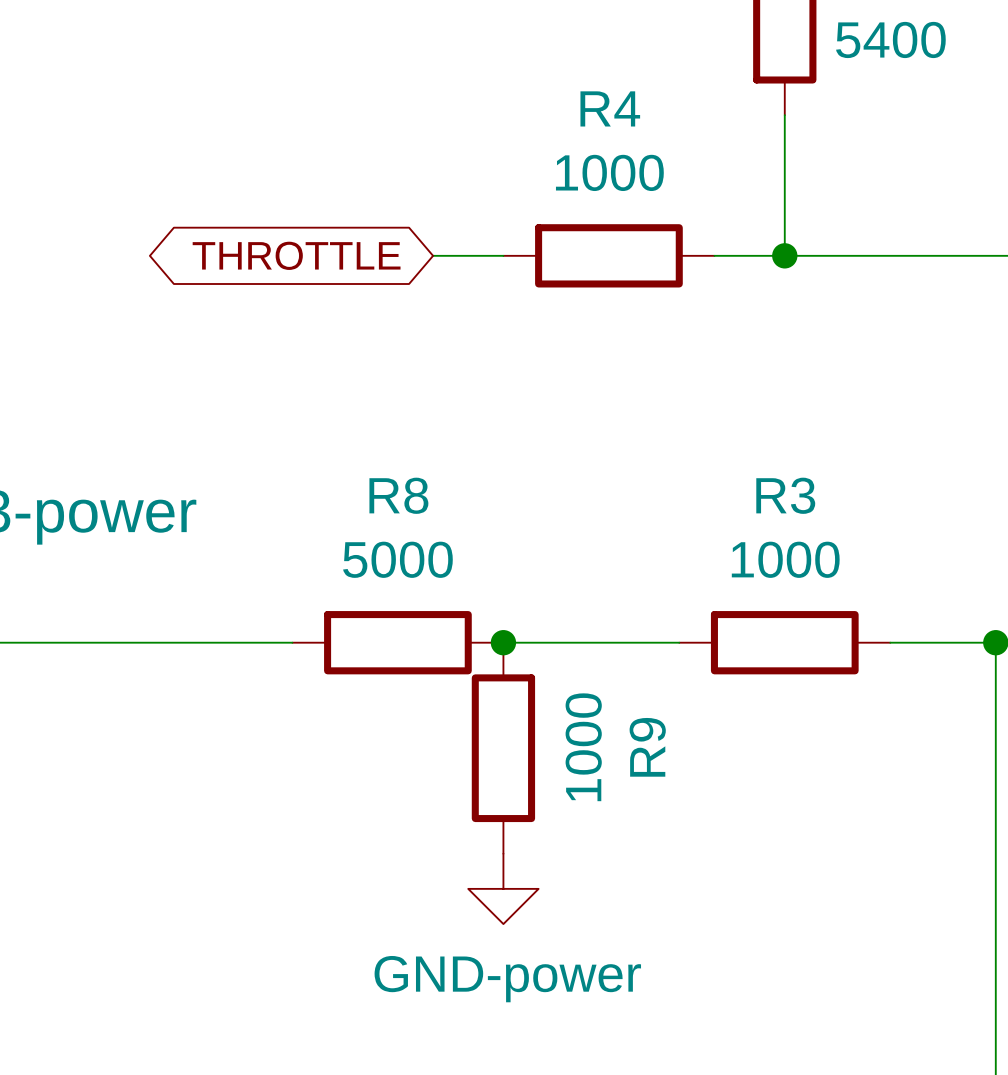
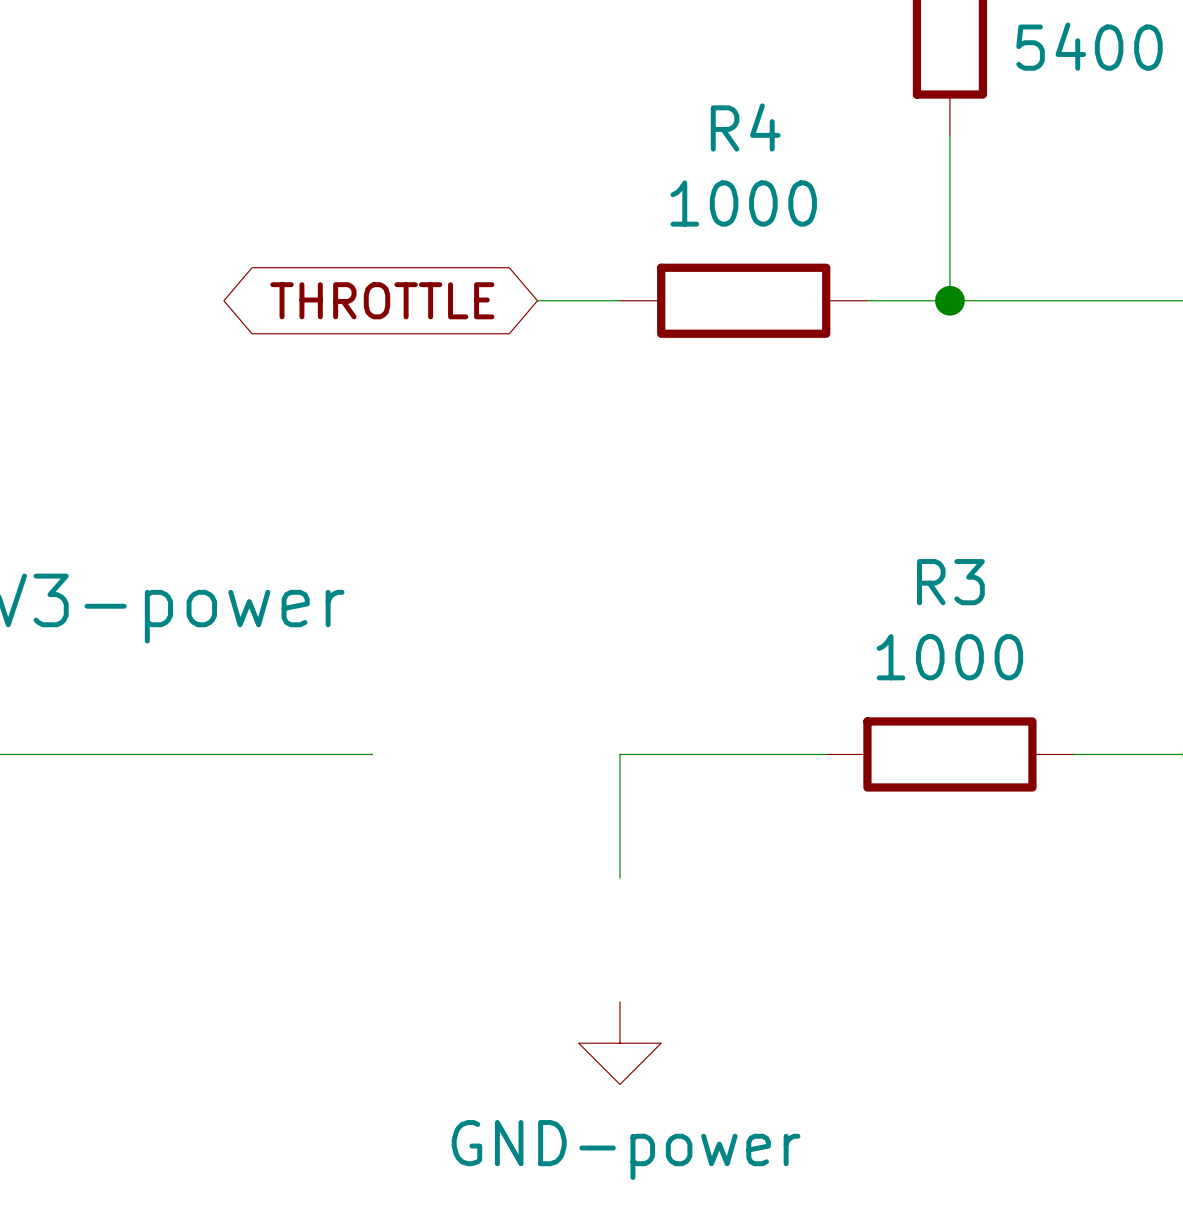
R8: 5000 (397, 642) -> none
wire: none -> (619, 754) (619, 878)
junction: (503, 642) -> none
R9: 1000 (503, 748) -> none

